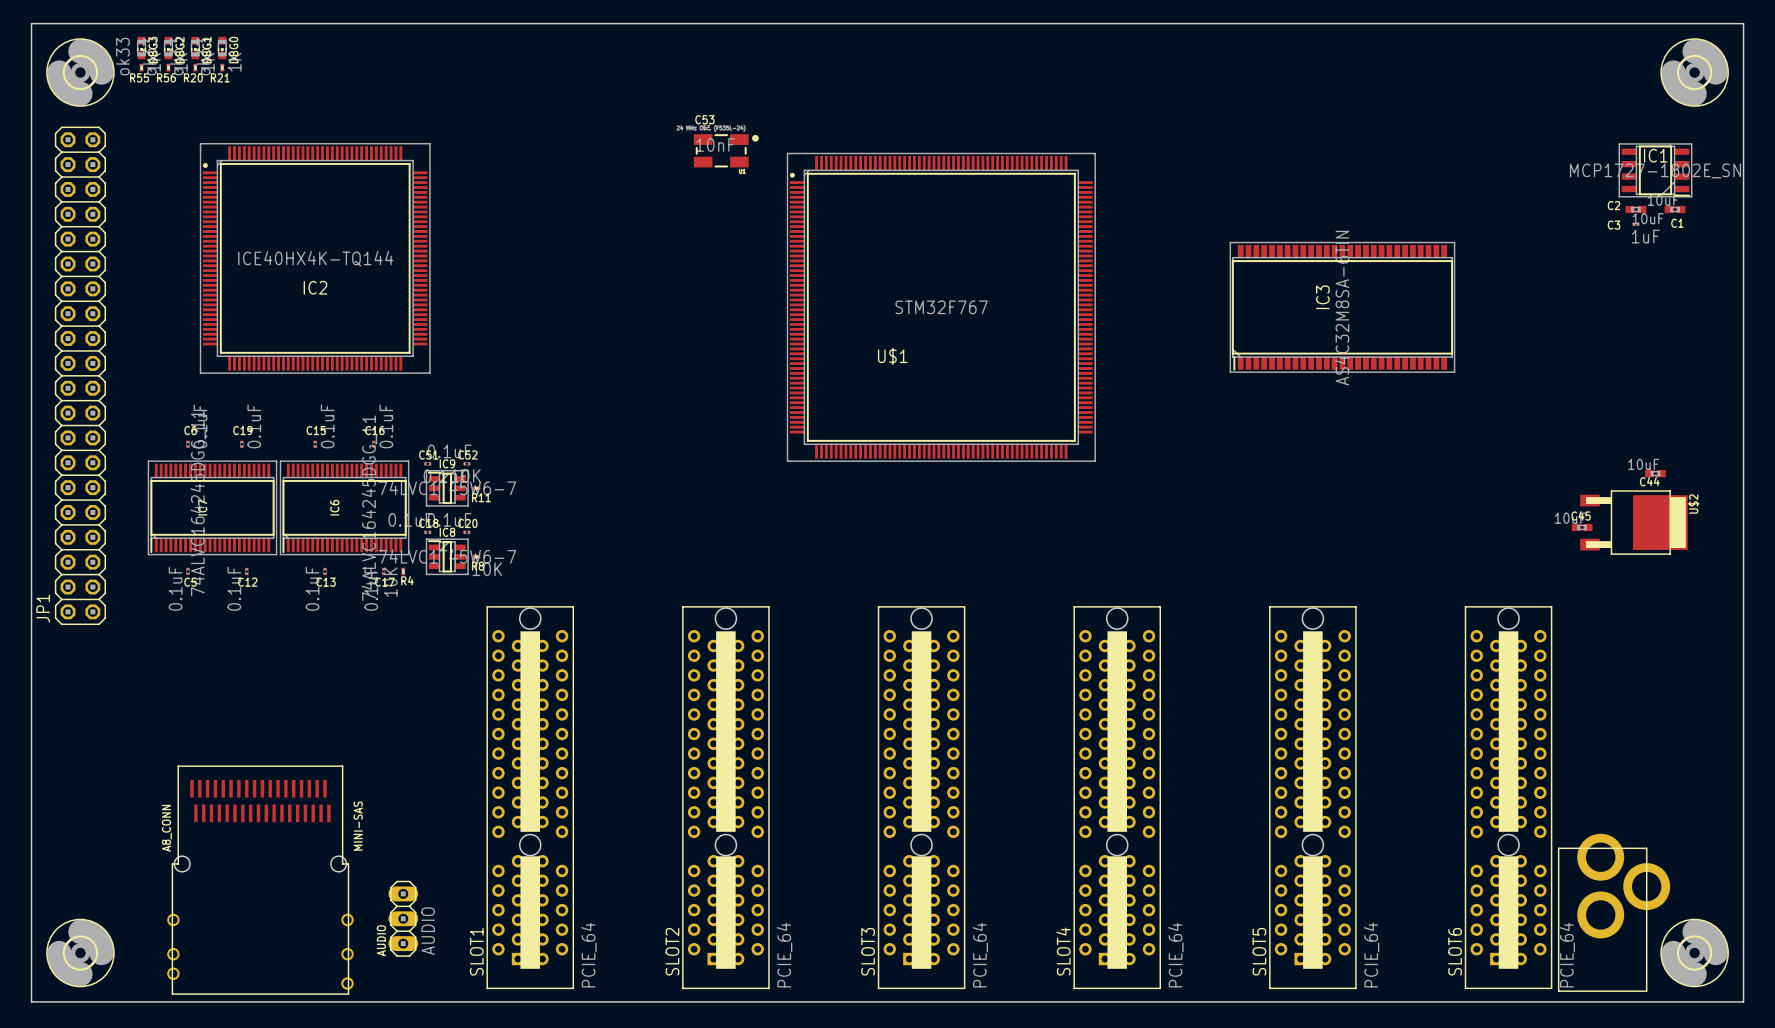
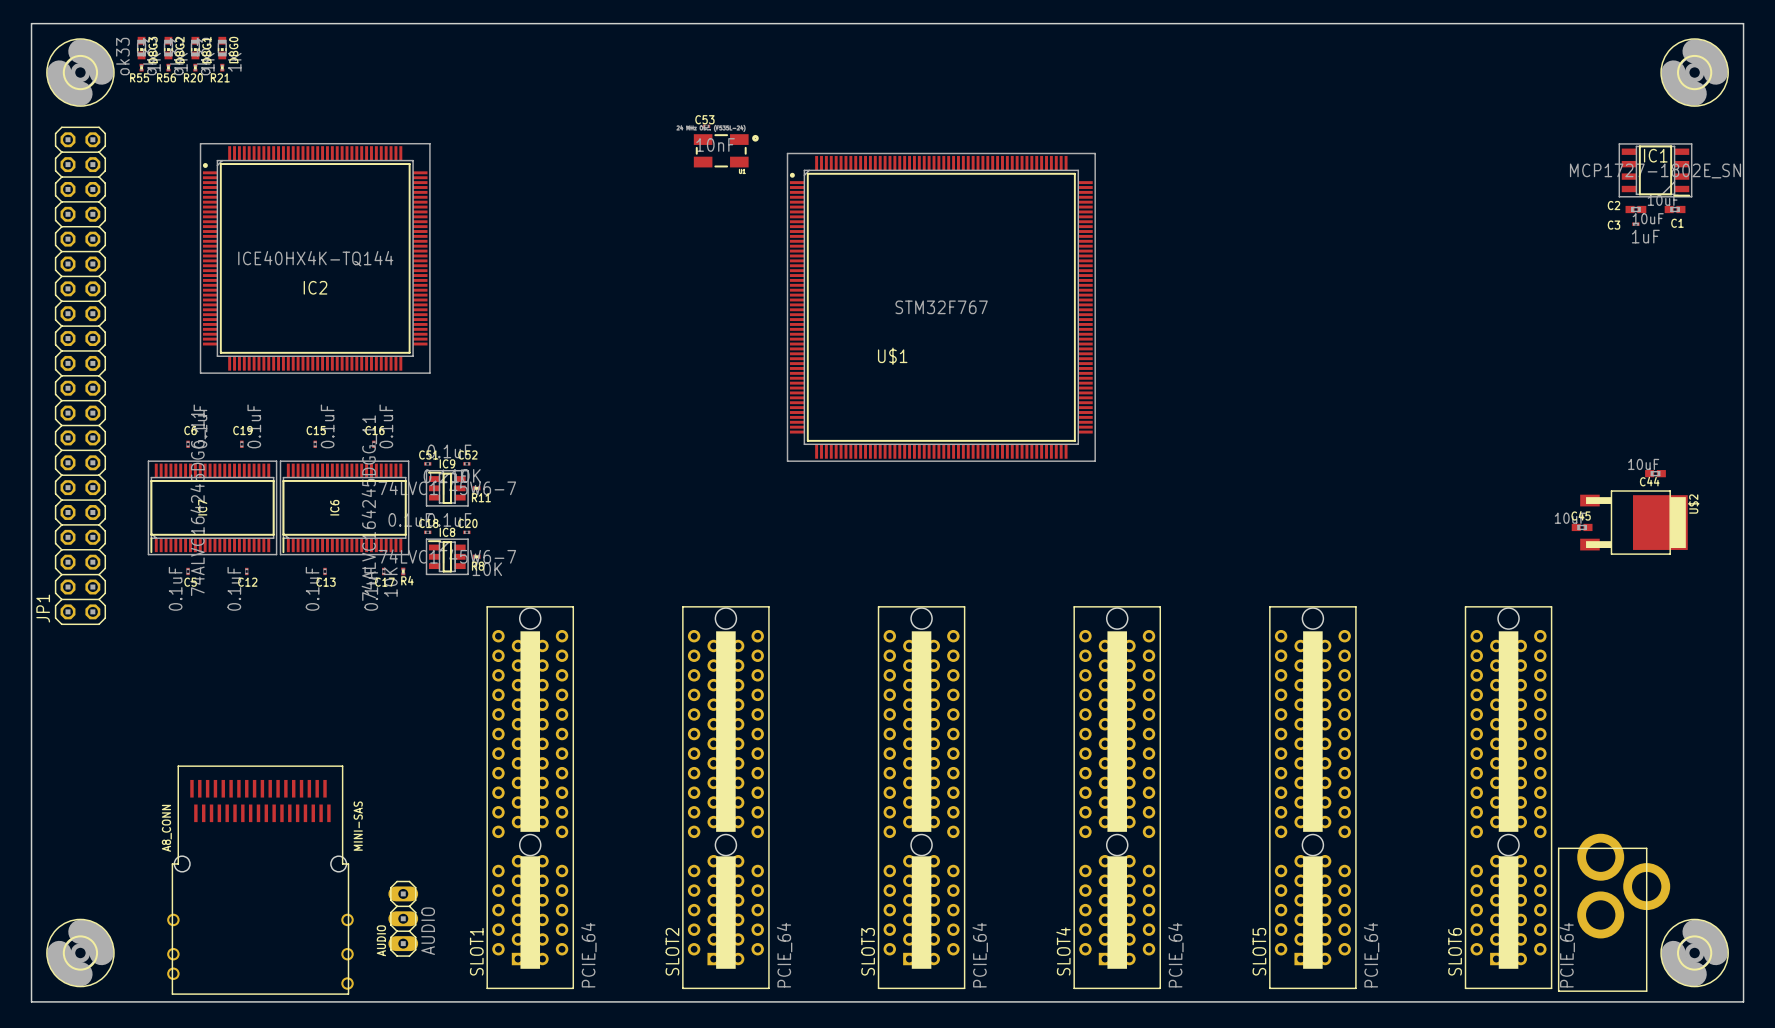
IC3: AS4C32M8SA-6TIN (1342, 307) -> none

